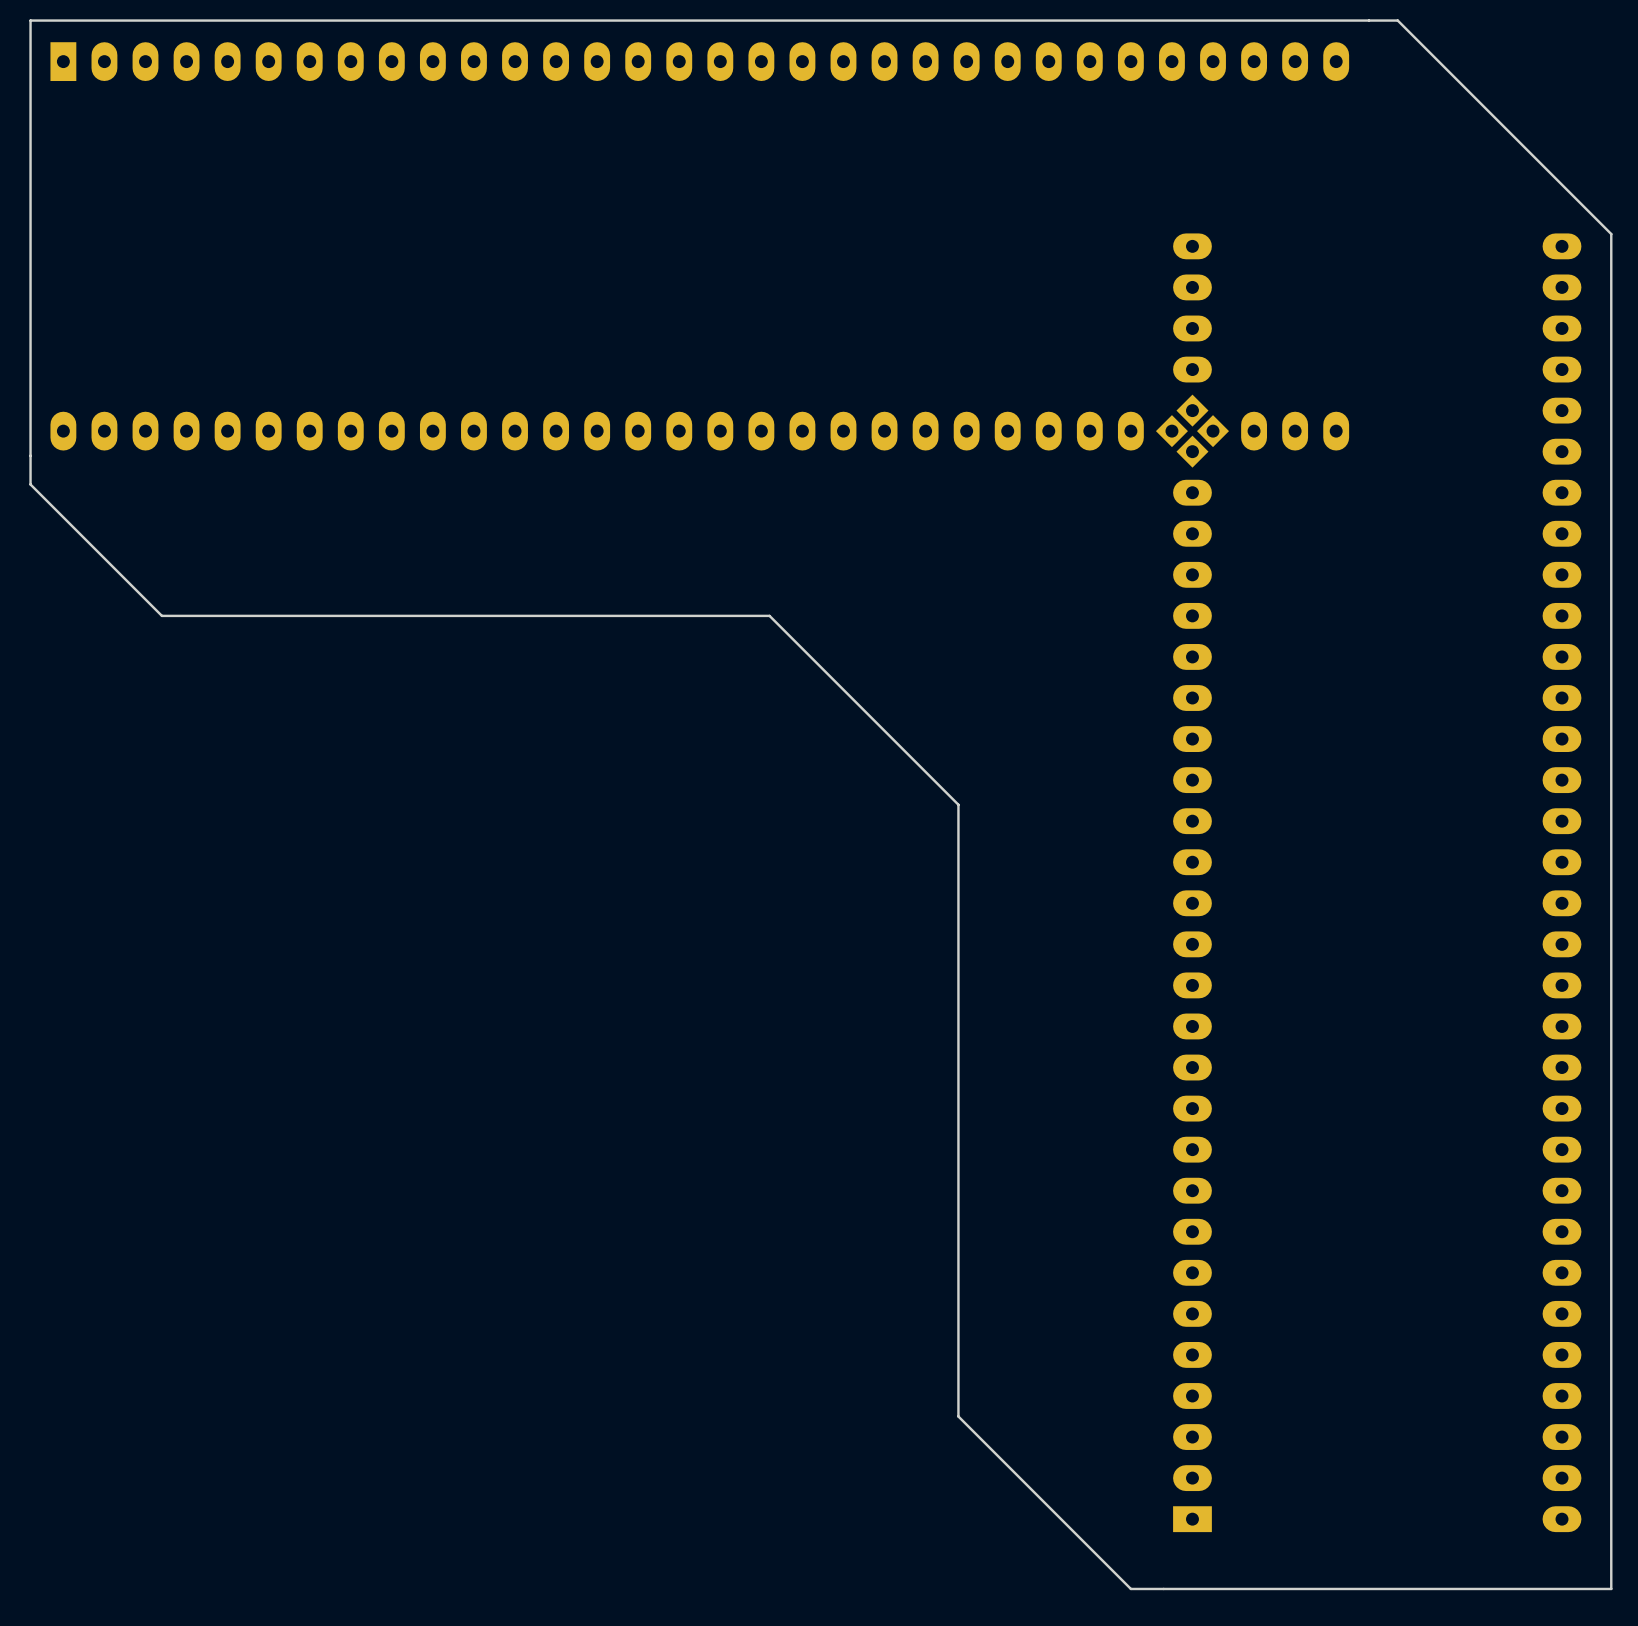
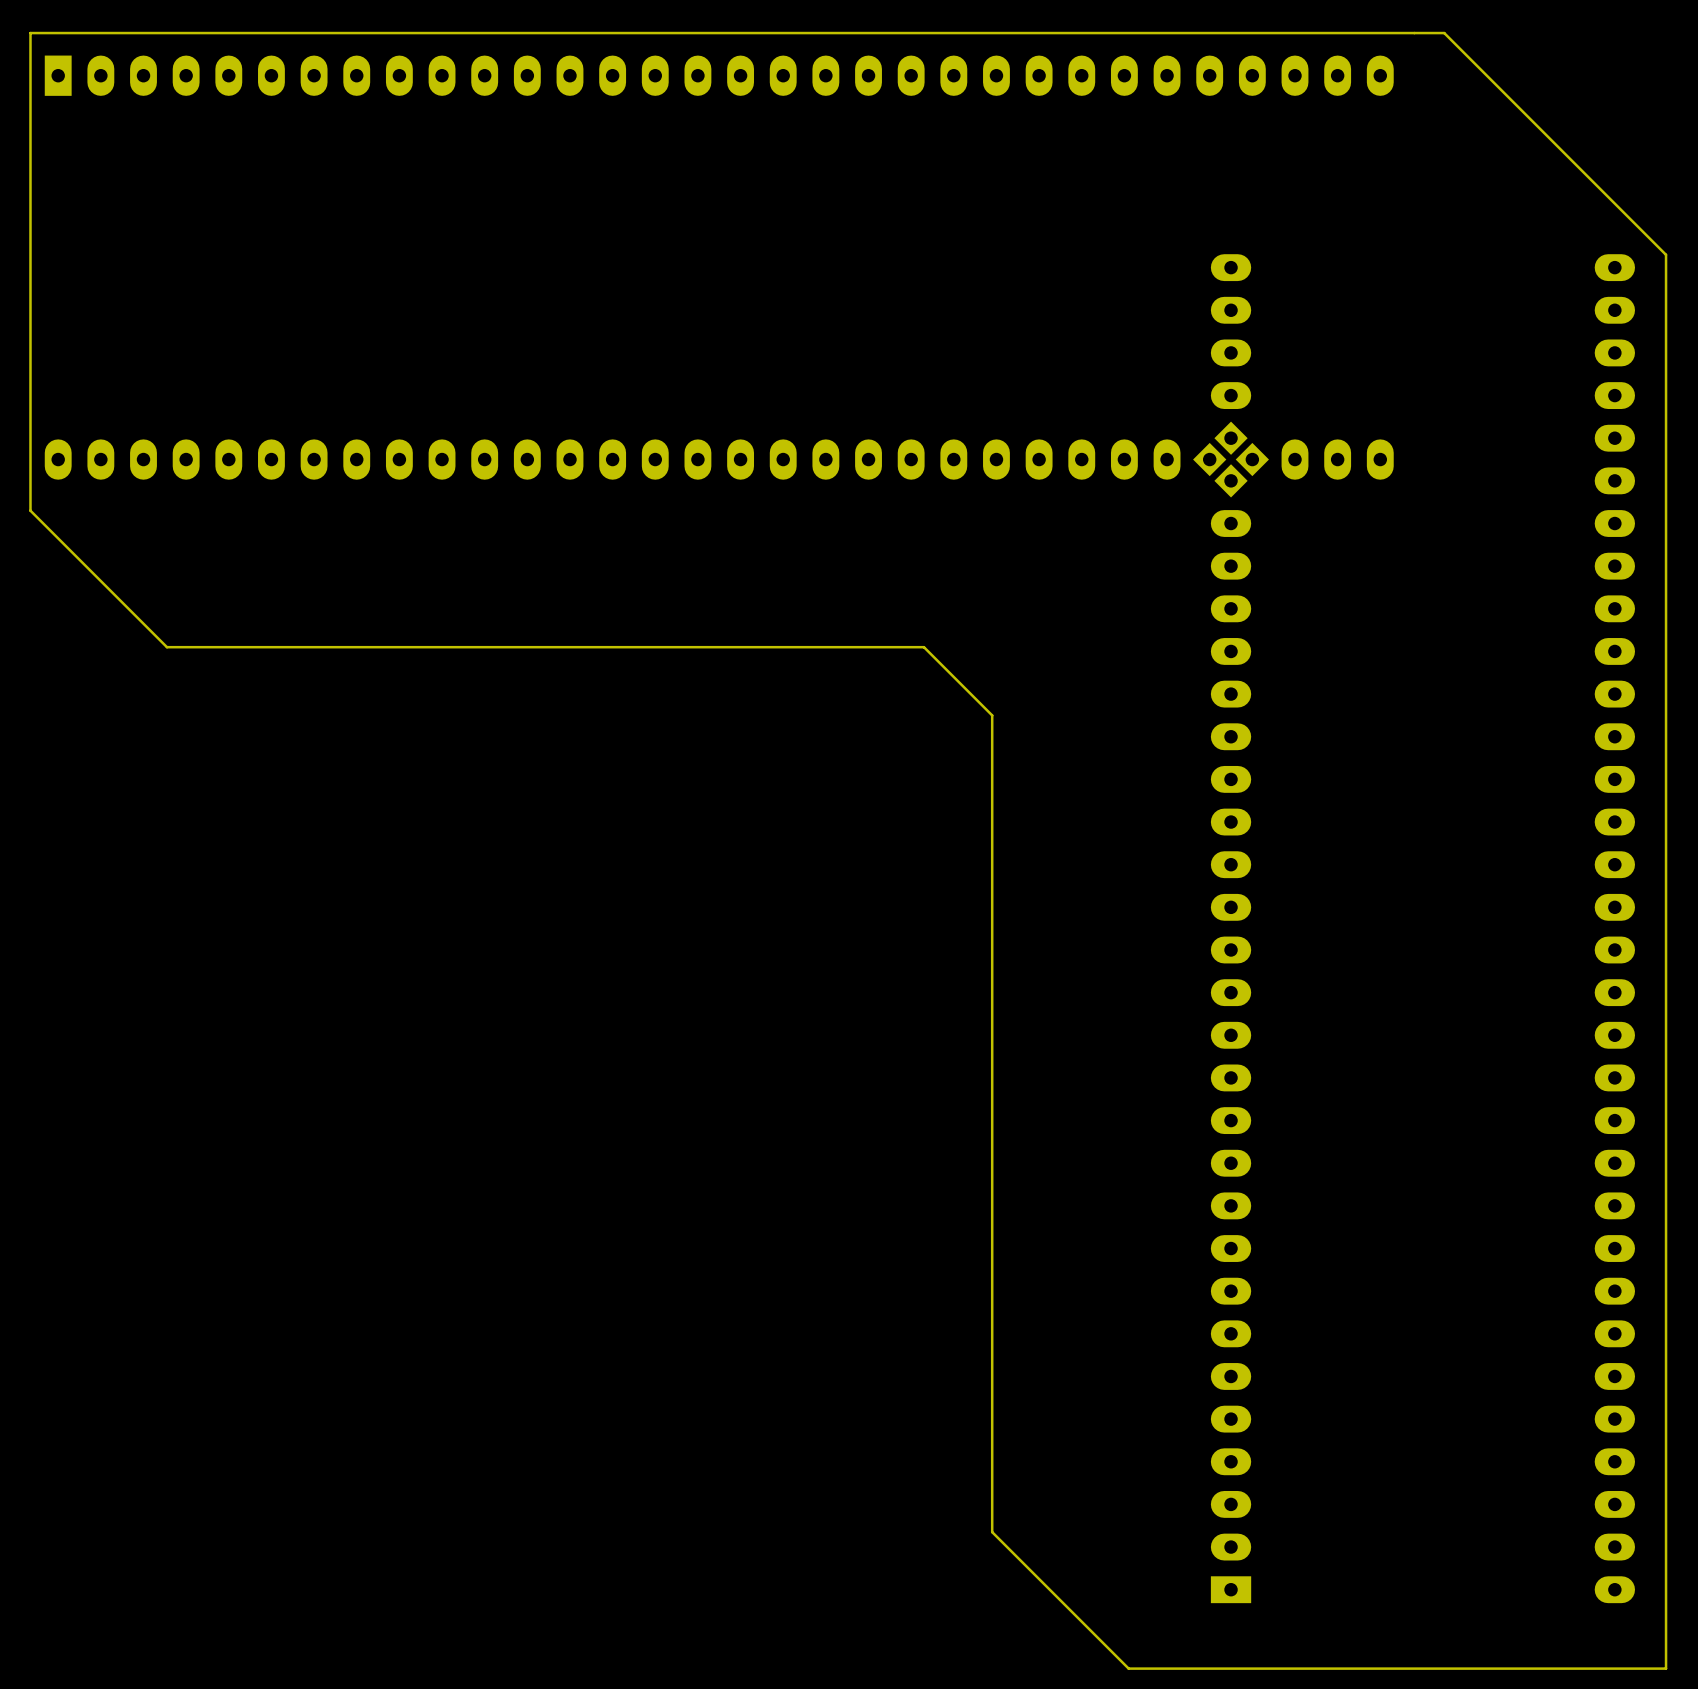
board edge: (36, 20) (30, 20) (30, 484) (161, 615) (769, 615) (958, 804) (958, 1416) (1130, 1588) (1611, 1588) -> (30, 33) (30, 510) (166, 647) (923, 647) (992, 715) (992, 1532) (1128, 1668) (1666, 1668) (1666, 1662)

